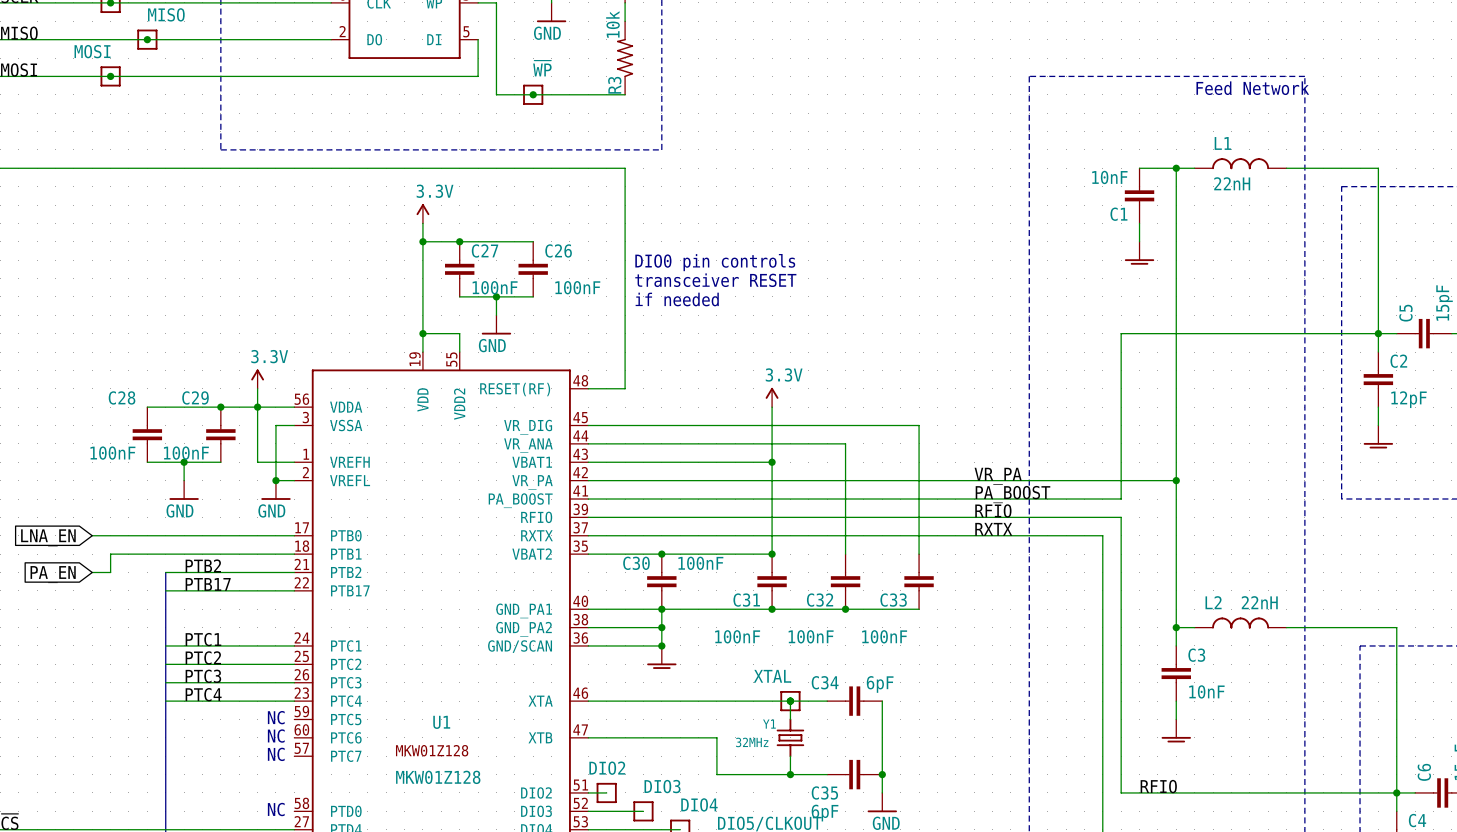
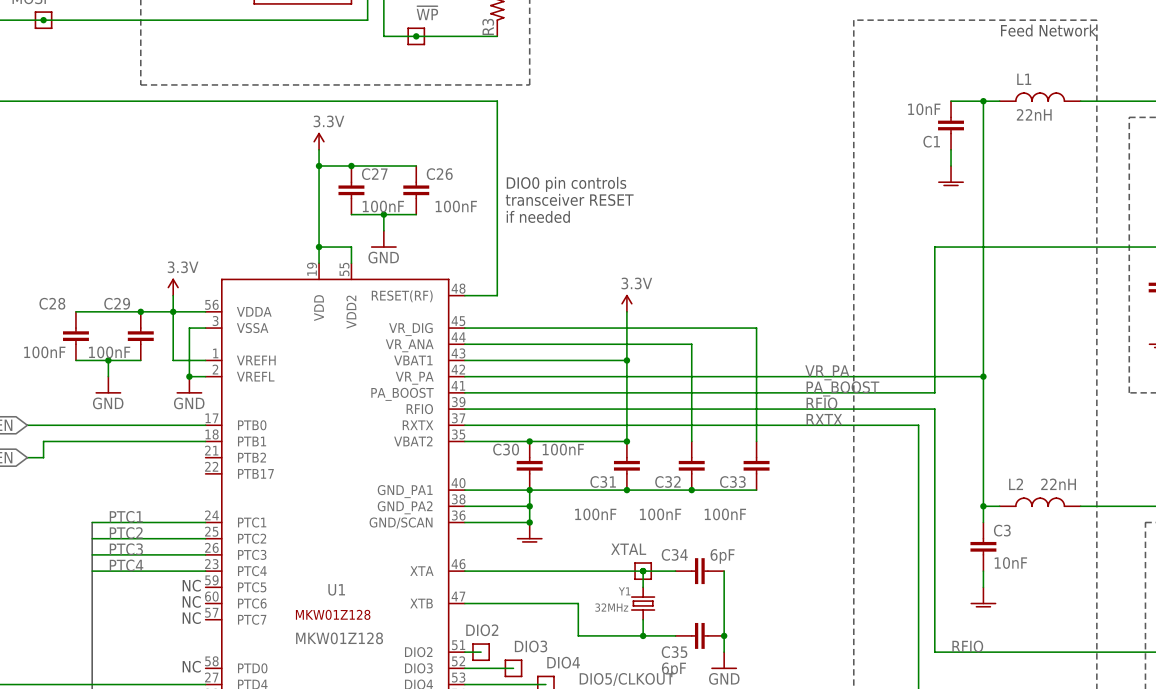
label: PTB2 (203, 565) -> none
bus: (165, 572) (165, 645) -> none
wire: (165, 572) (294, 572) -> none
label: PTB17 (208, 584) -> none
wire: (165, 590) (294, 590) -> none

